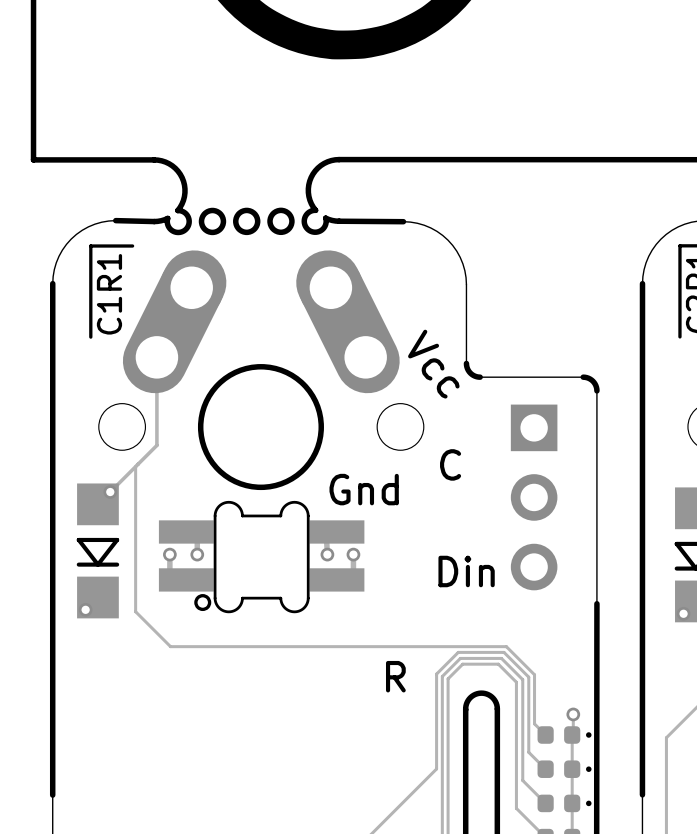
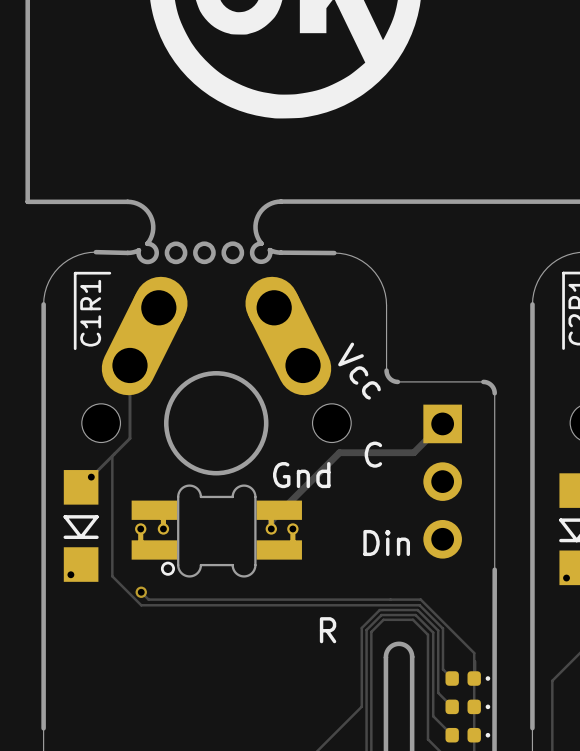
track: none -> (442, 423) (413, 452) (339, 452) (271, 520) (271, 528)
part footprint: [158, 500, 365, 614] -> [131, 484, 302, 578]
track: none -> (141, 592) (148, 599) (420, 599) (474, 653) (474, 678)
via: none -> (141, 592)
via: (573, 714) -> none

